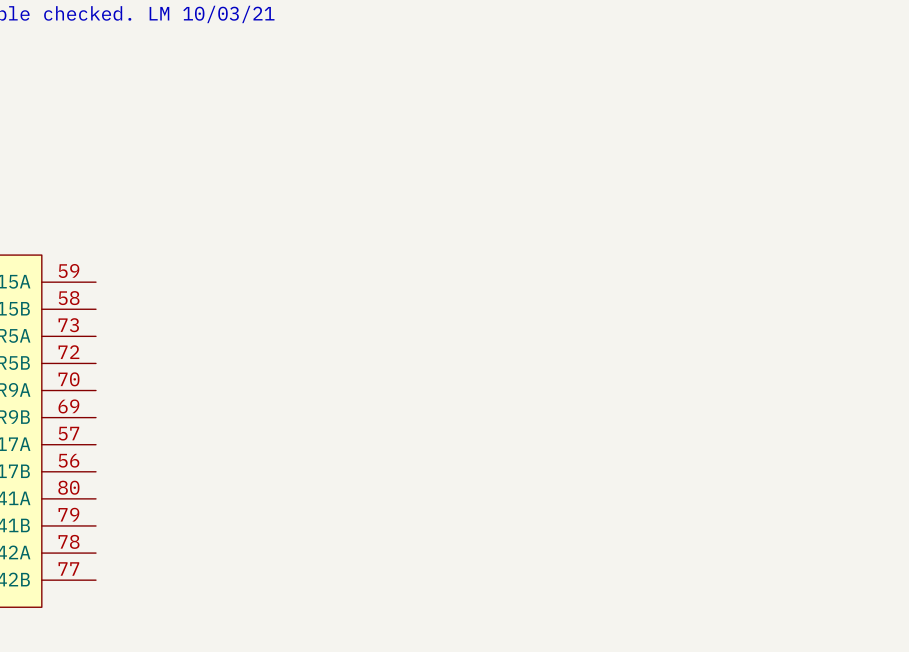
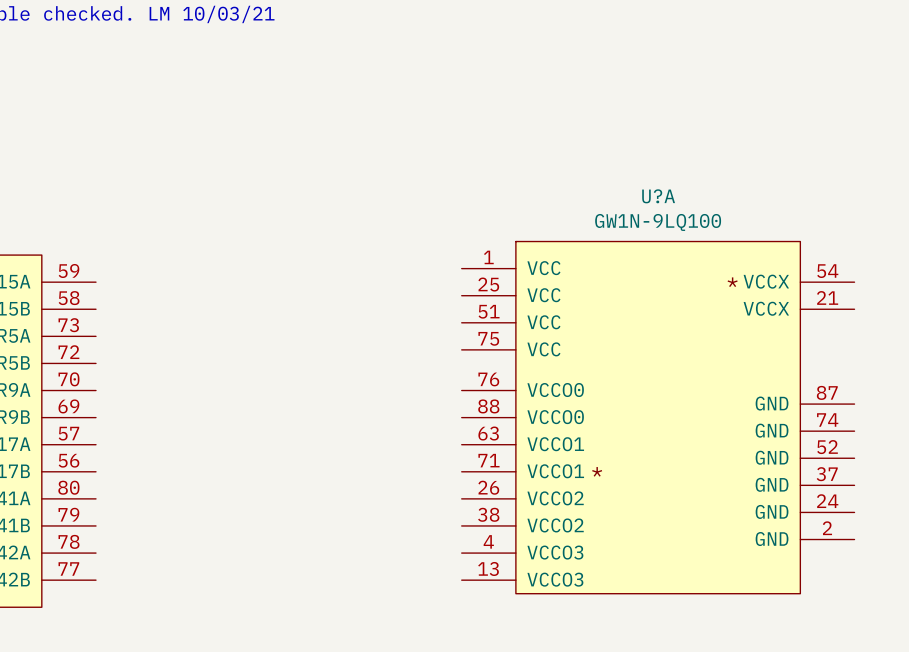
U?A: none -> GW1N-9LQ100 (658, 417)

